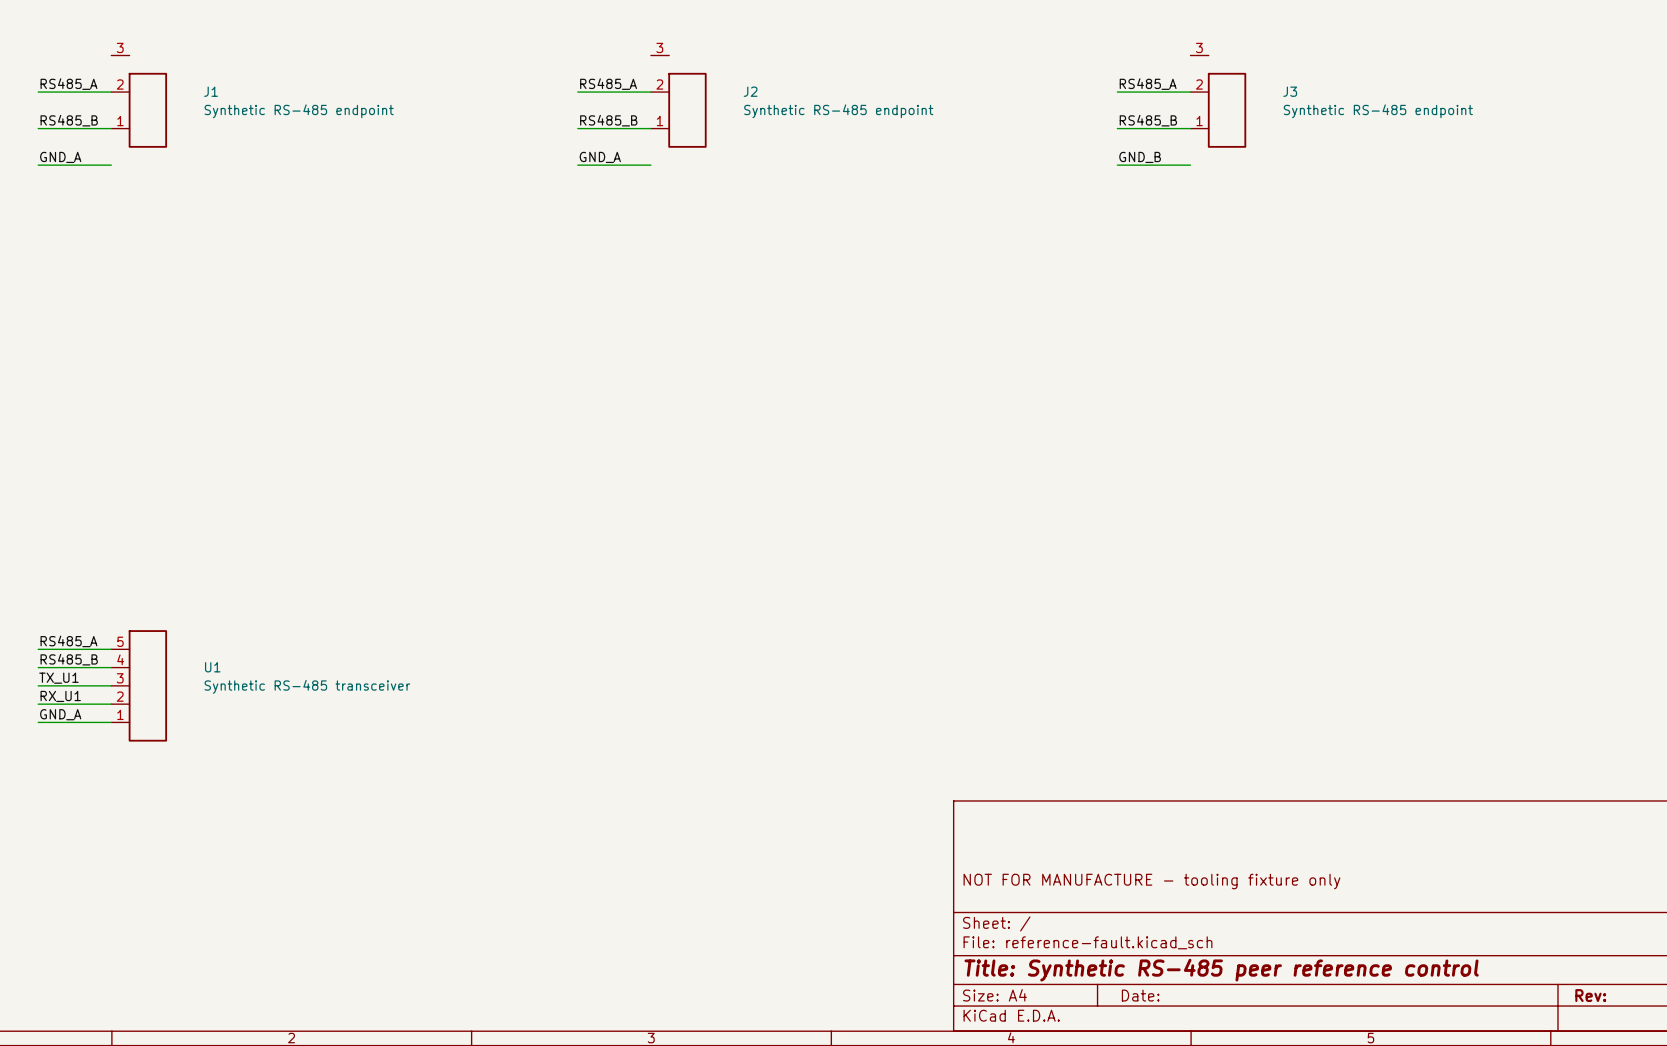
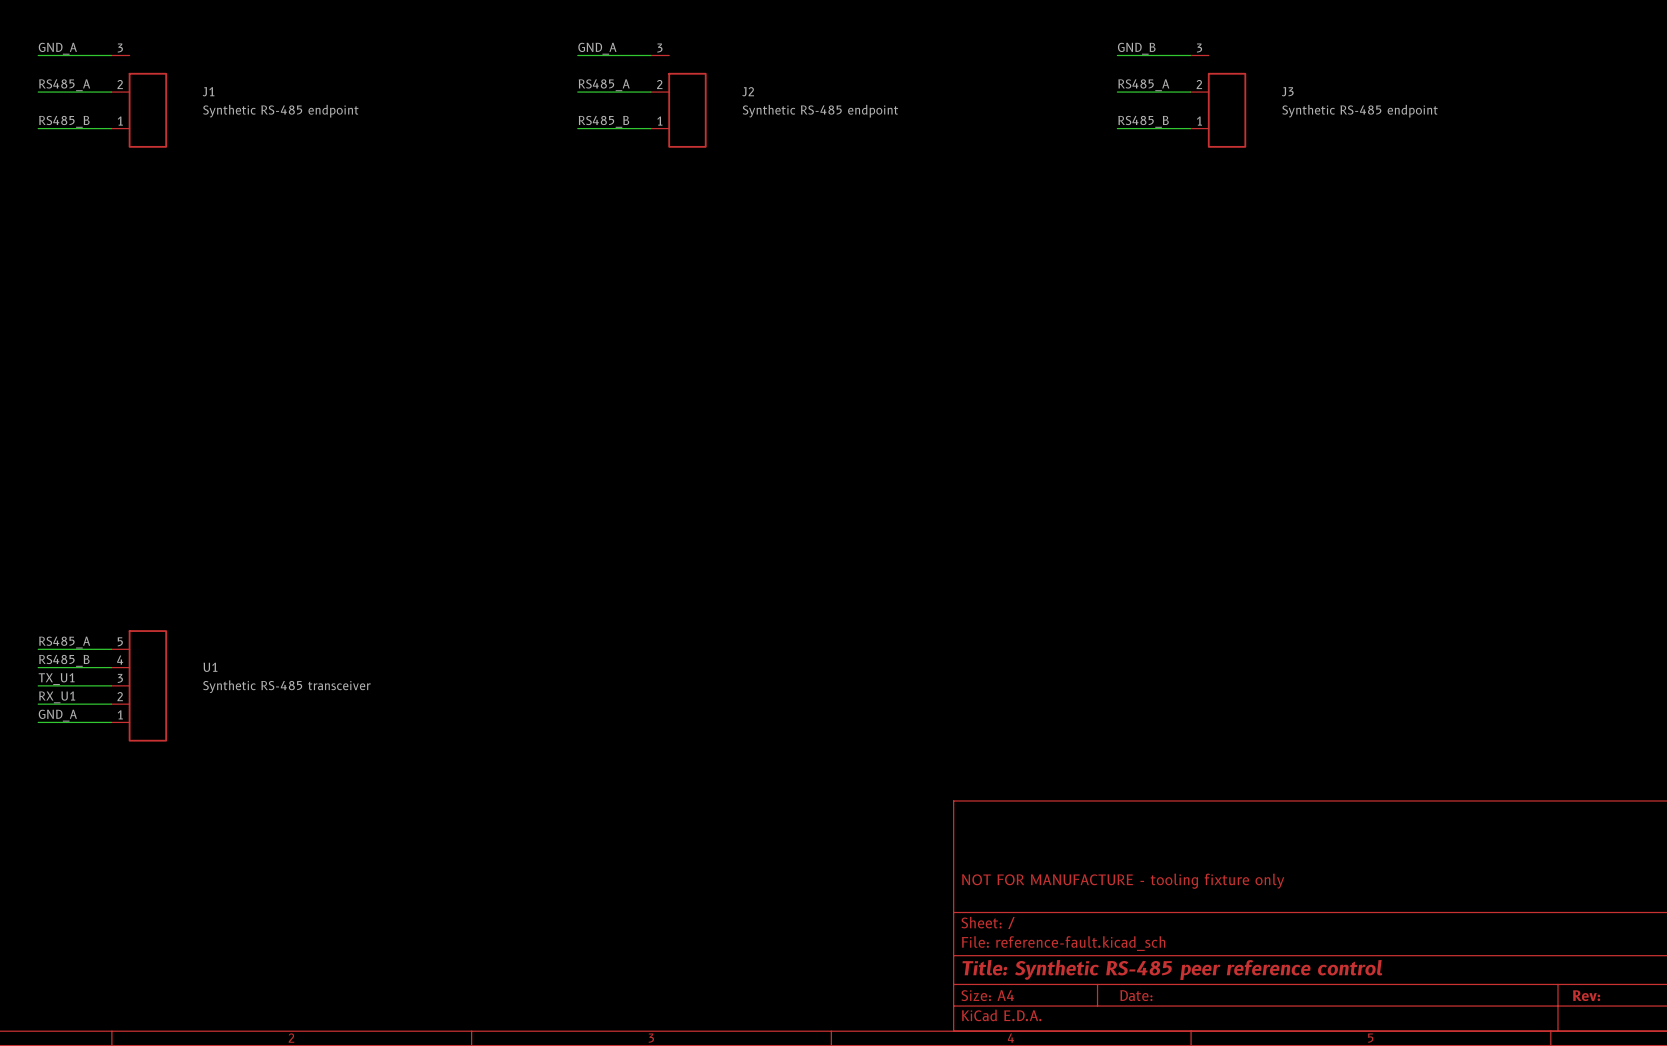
label position: GND_A (60, 157) -> GND_A (57, 48)
label position: GND_A (600, 157) -> GND_A (597, 48)
label position: GND_B (1140, 157) -> GND_B (1136, 48)
wire: (38, 165) (111, 165) -> (38, 55) (111, 55)
wire: (577, 165) (650, 165) -> (577, 55) (650, 55)
wire: (1117, 165) (1190, 165) -> (1117, 55) (1190, 55)

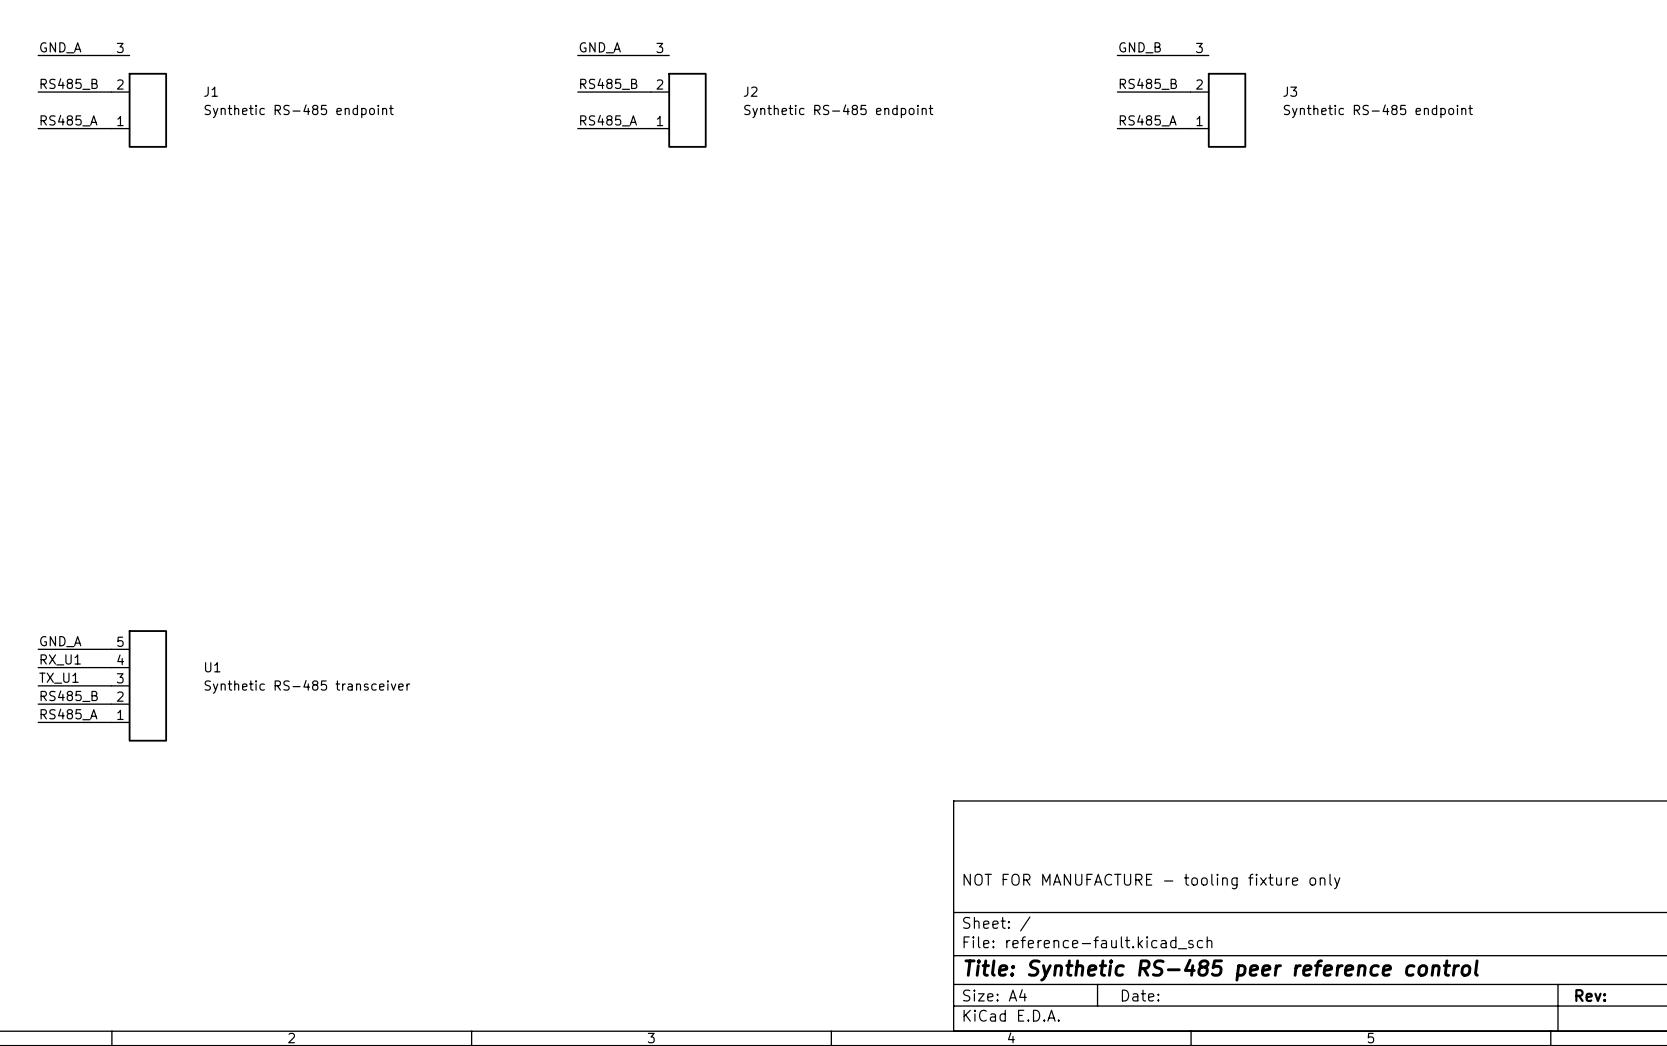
label: RS485_A (64, 85) -> RS485_B (69, 84)
label: RS485_A (604, 85) -> RS485_B (608, 84)
label: RS485_A (1143, 85) -> RS485_B (1148, 84)
label: RS485_B (64, 121) -> RS485_A (68, 120)
label: RS485_B (603, 121) -> RS485_A (608, 120)
label: RS485_B (1143, 121) -> RS485_A (1148, 120)
label: RS485_A (64, 642) -> GND_A (60, 641)
label: RS485_B (64, 660) -> RX_U1 (60, 659)
label: RX_U1 (57, 697) -> RS485_B (69, 696)
label: GND_A (57, 715) -> RS485_A (68, 714)

